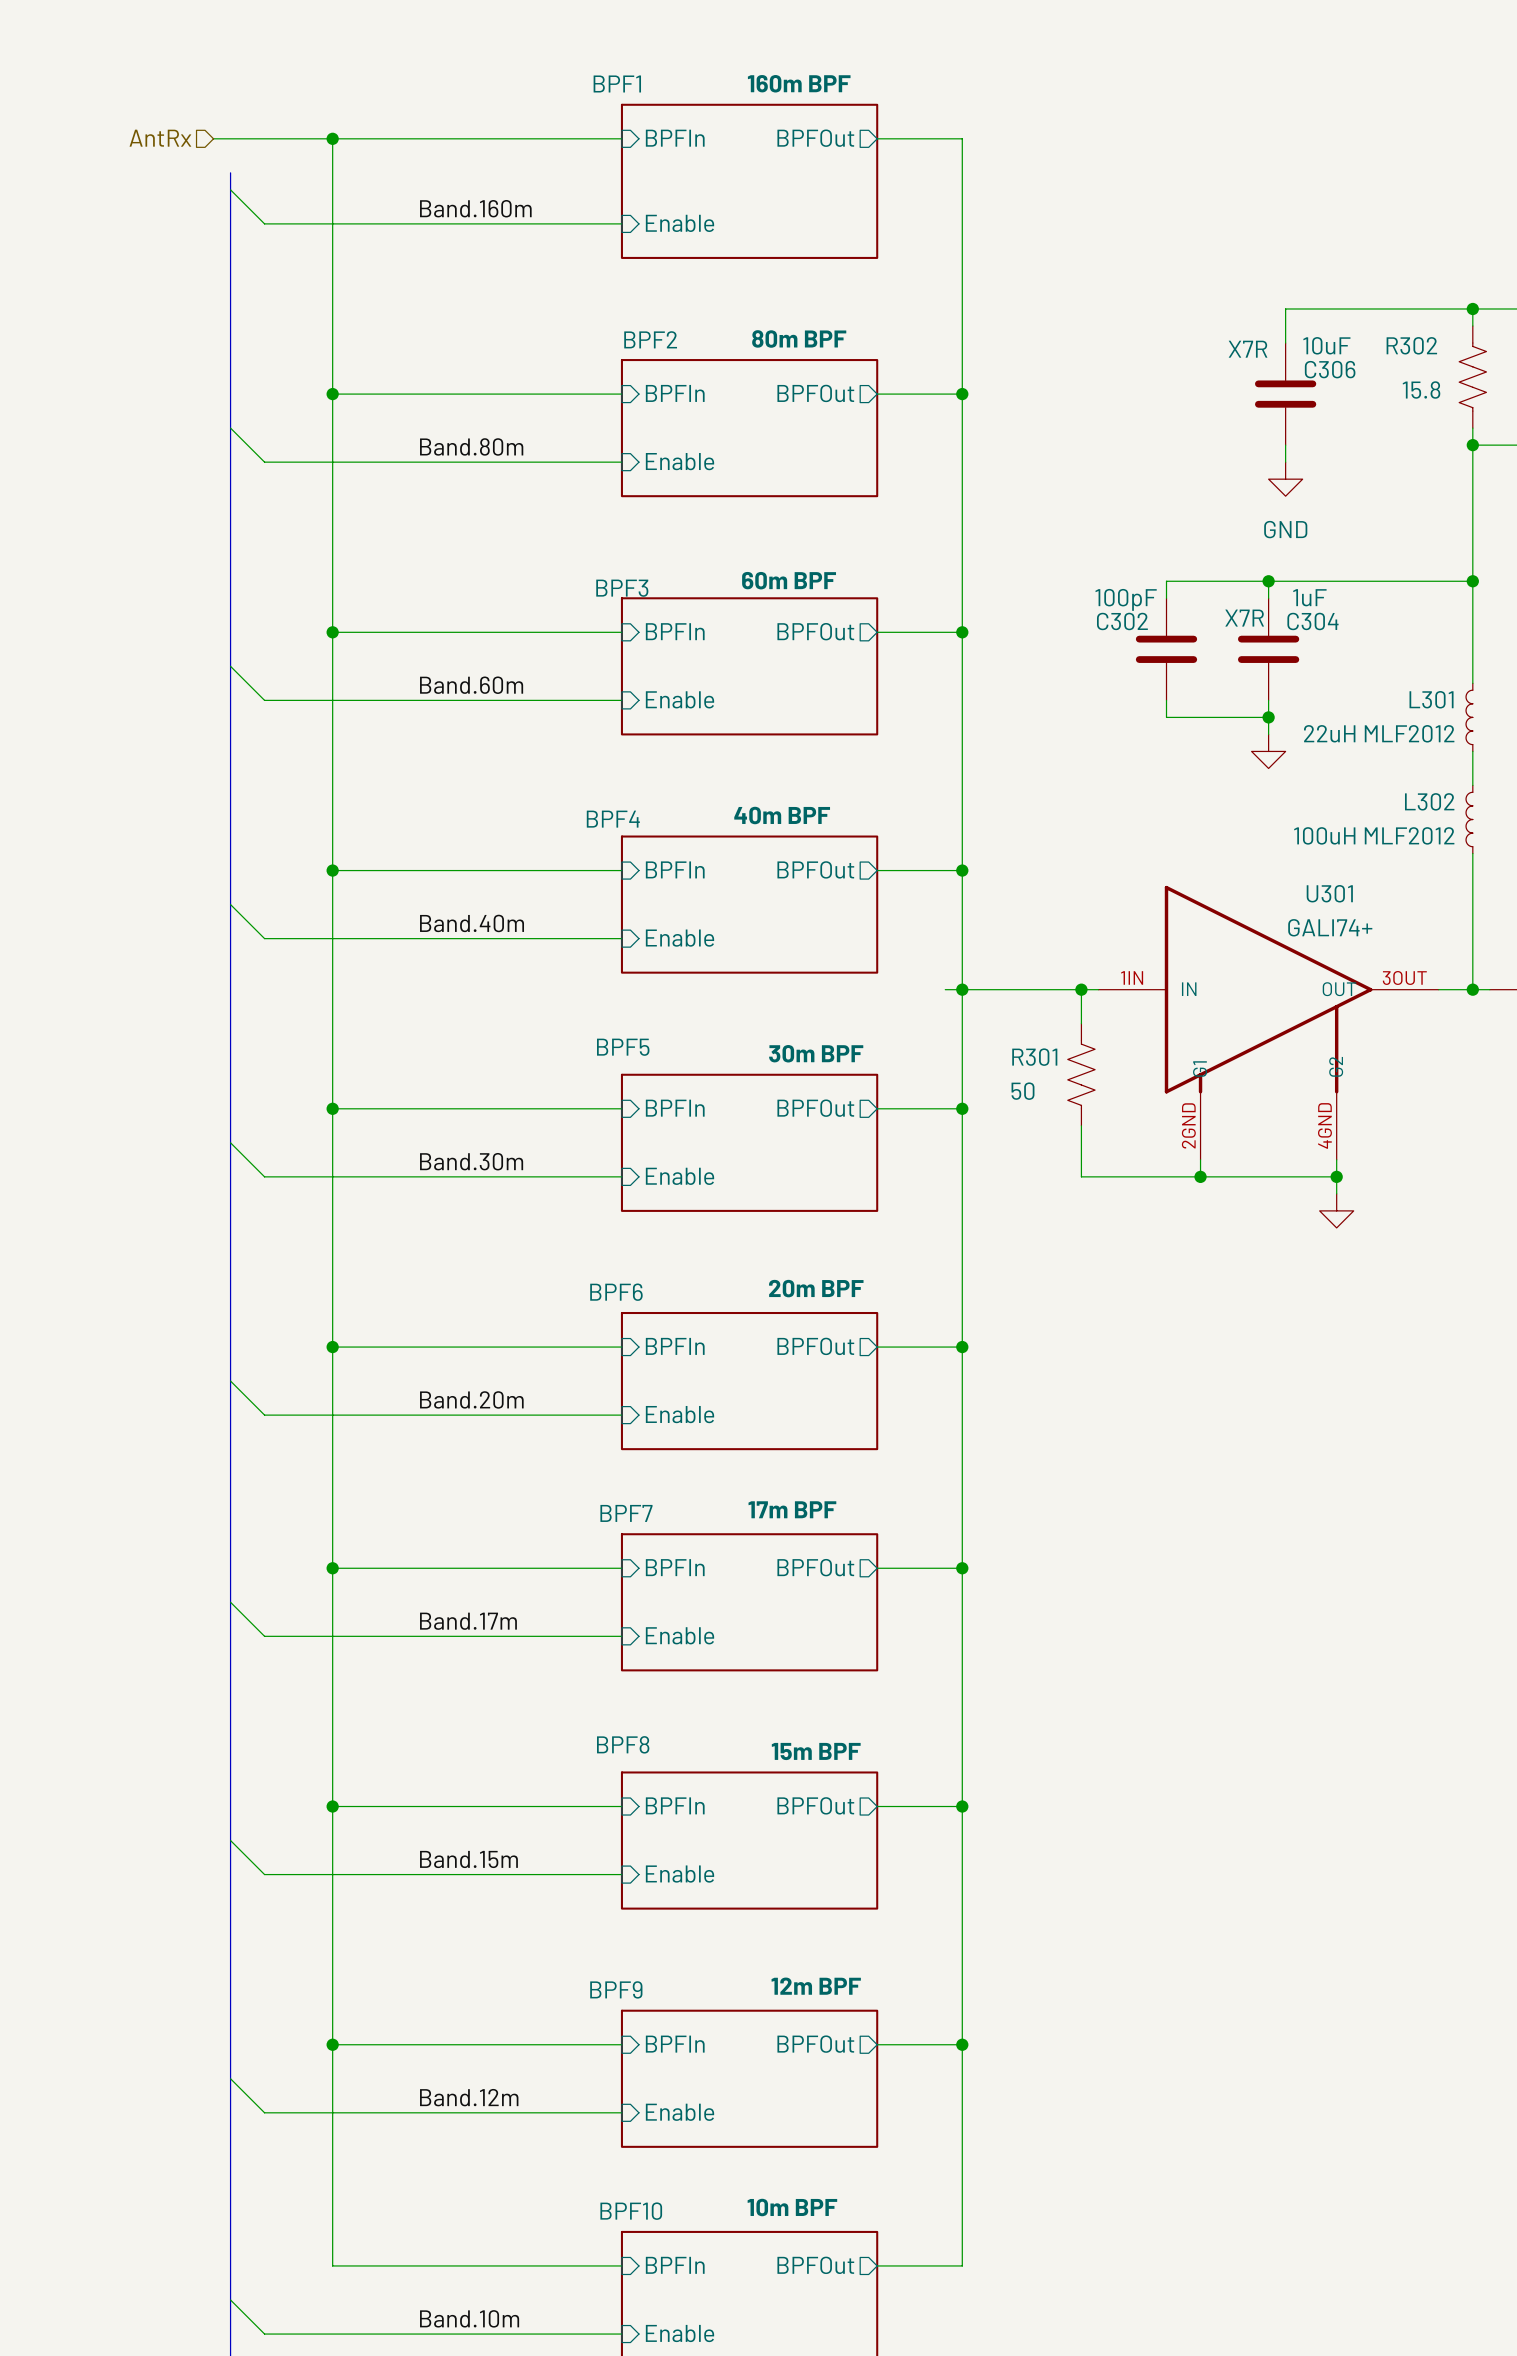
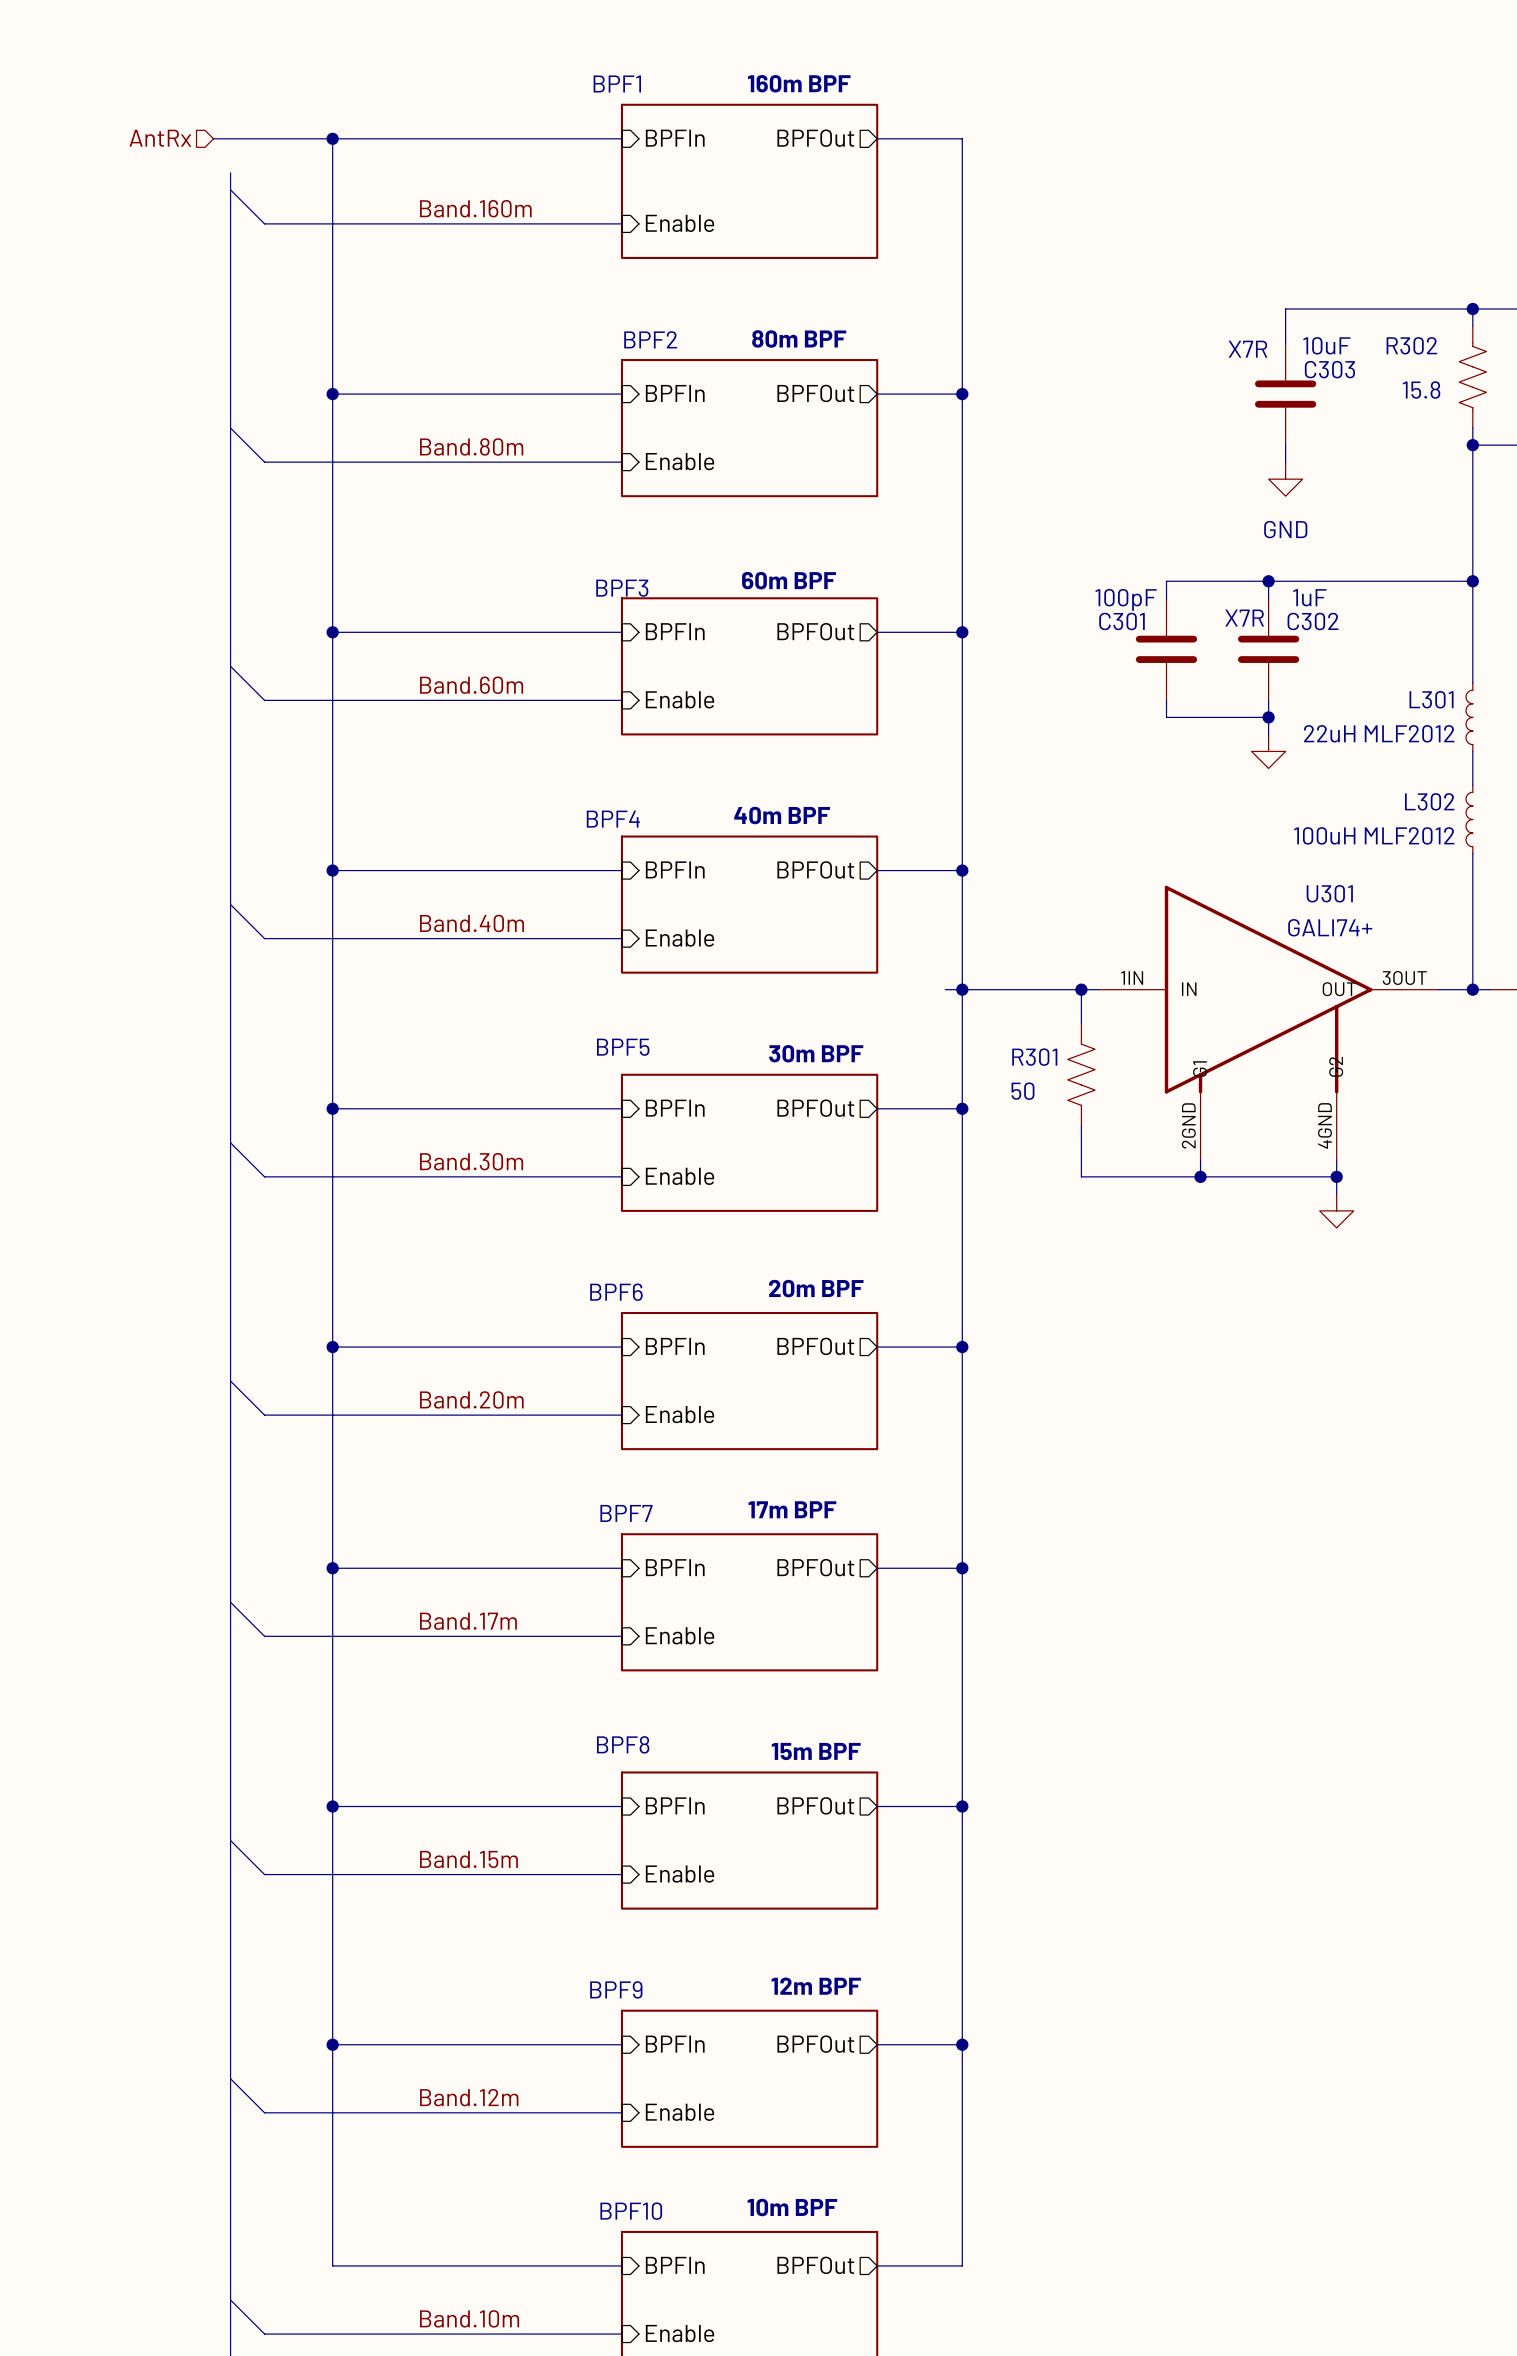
C306 name: C306 (1330, 369) -> C303 (1329, 369)
C302 name: C302 (1122, 621) -> C301 (1122, 621)
C304 name: C304 (1312, 621) -> C302 (1313, 621)

